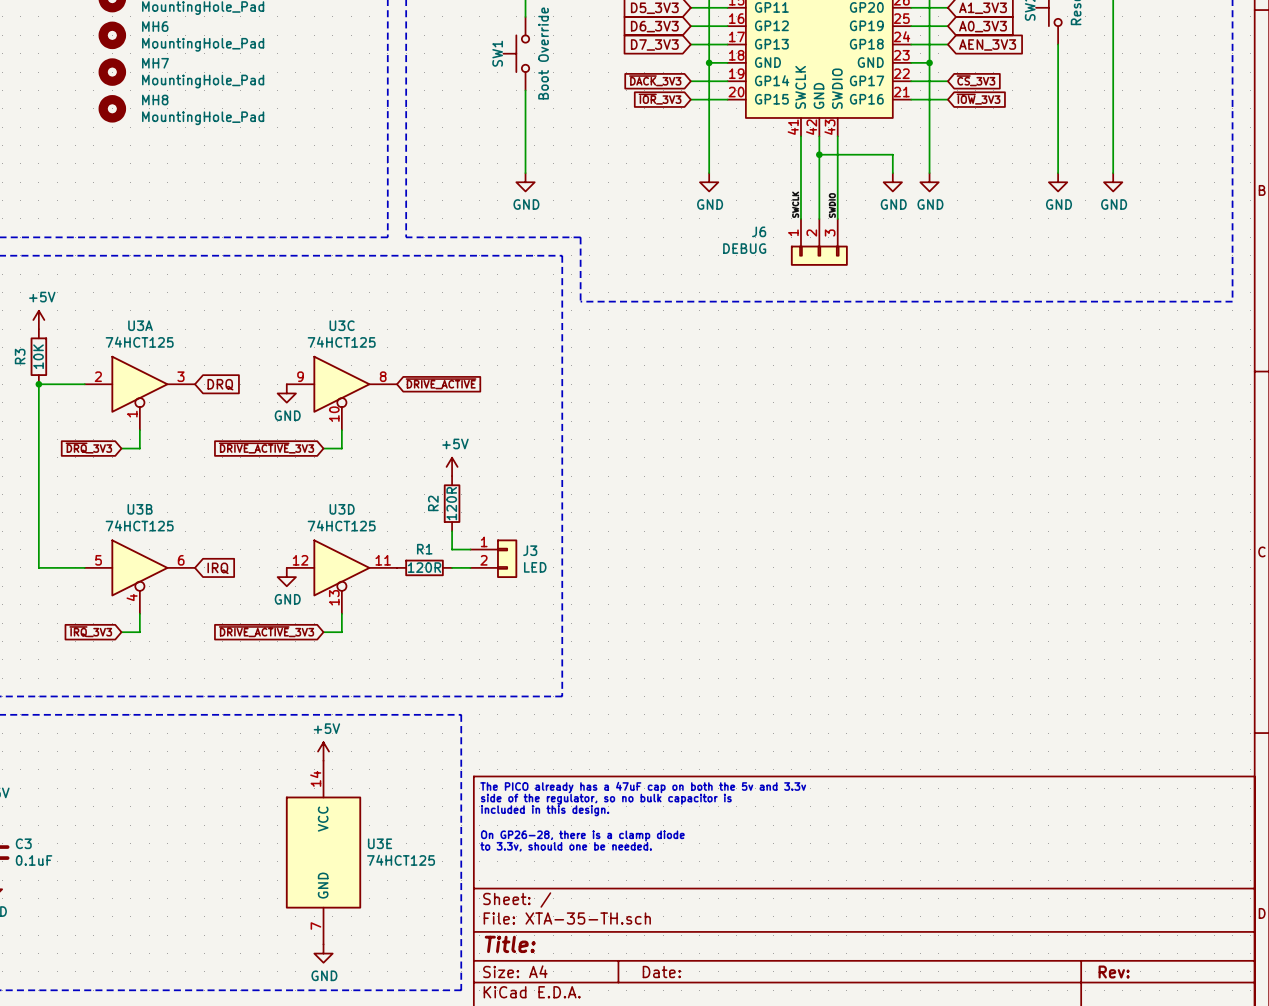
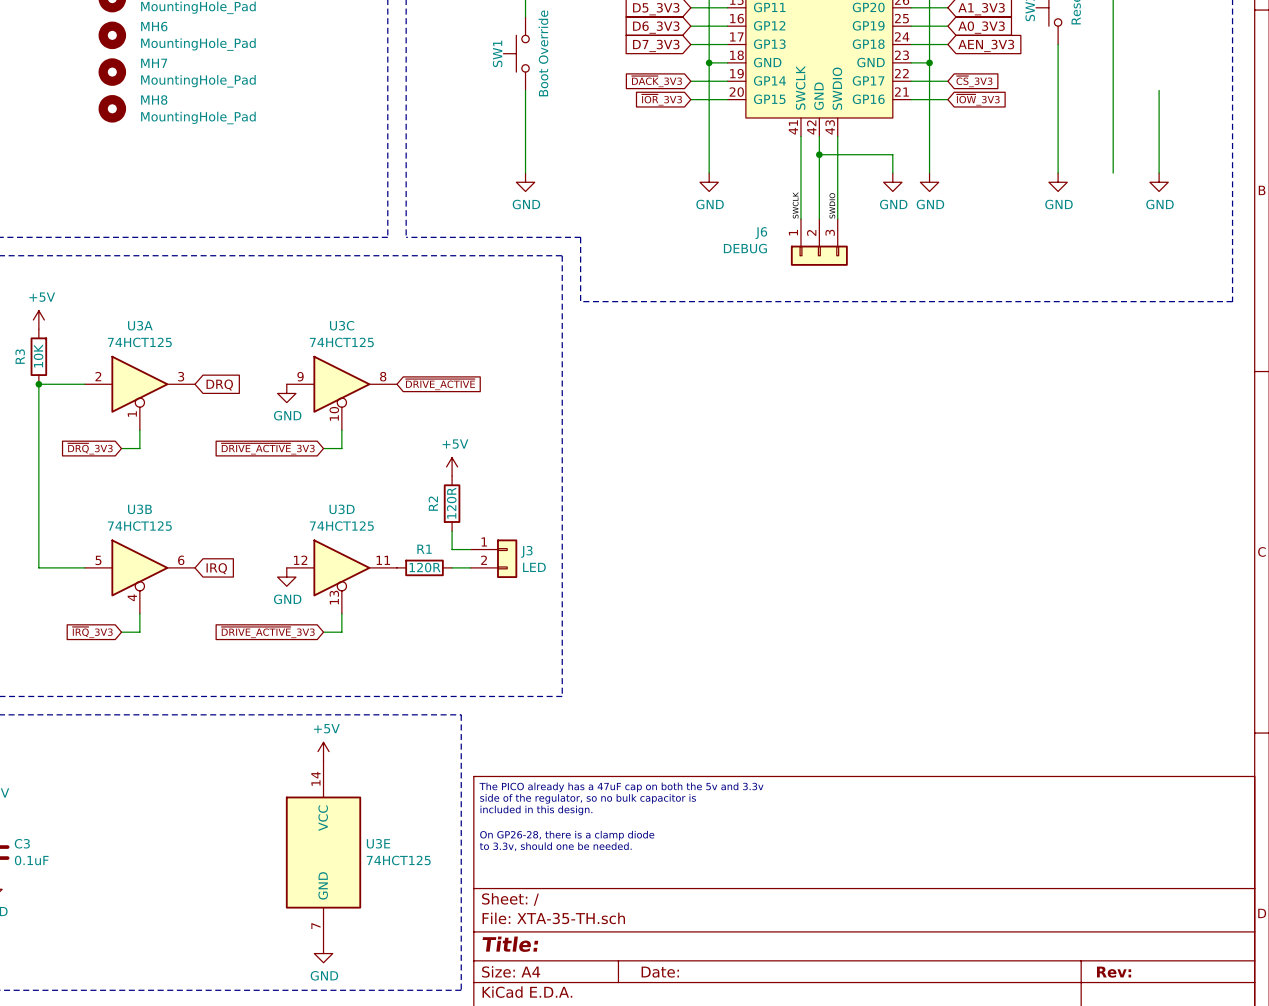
wire: none -> (1159, 90) (1159, 173)
power symbol position: GND (1113, 182) -> GND (1159, 182)

